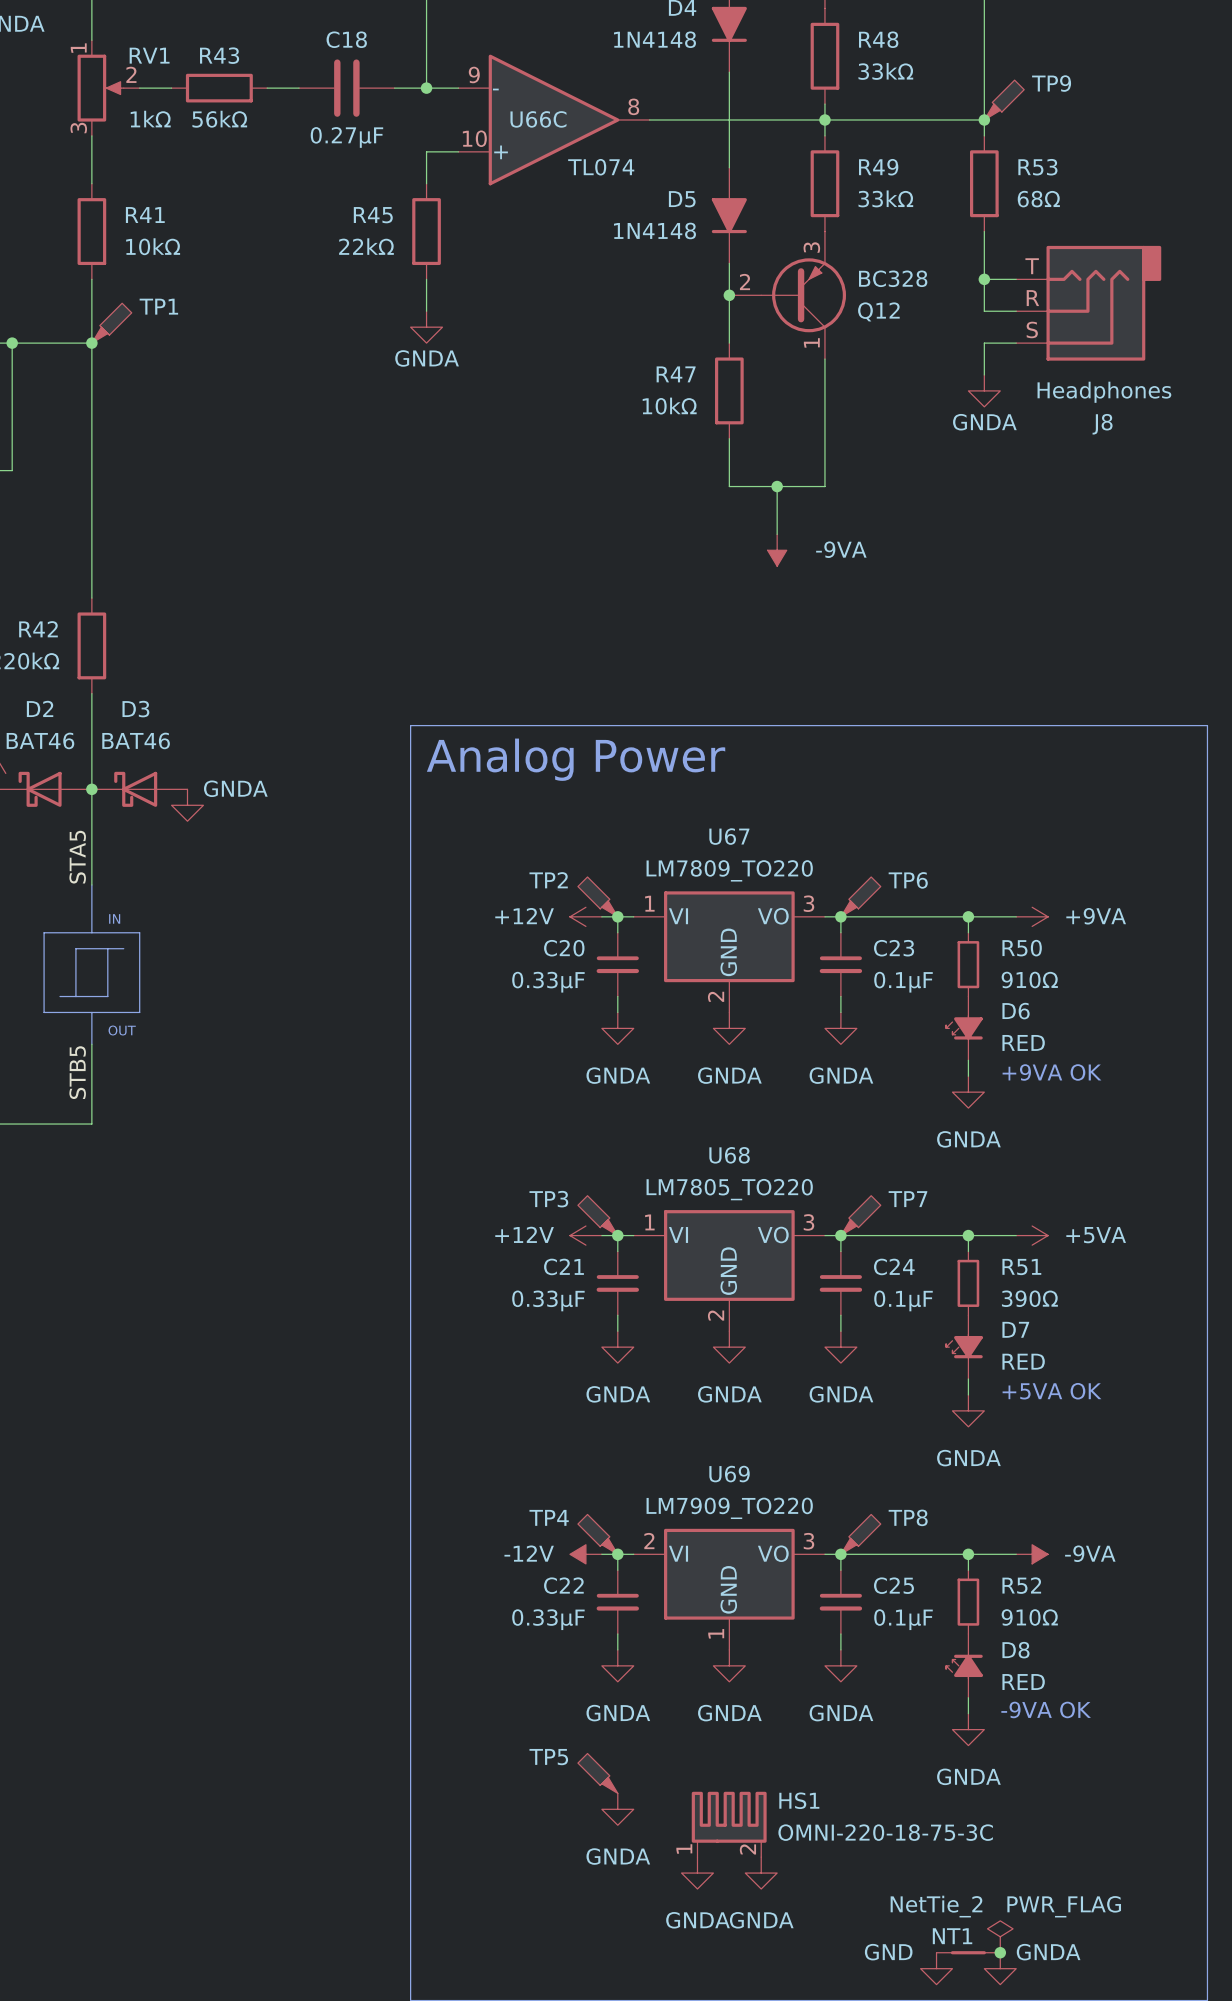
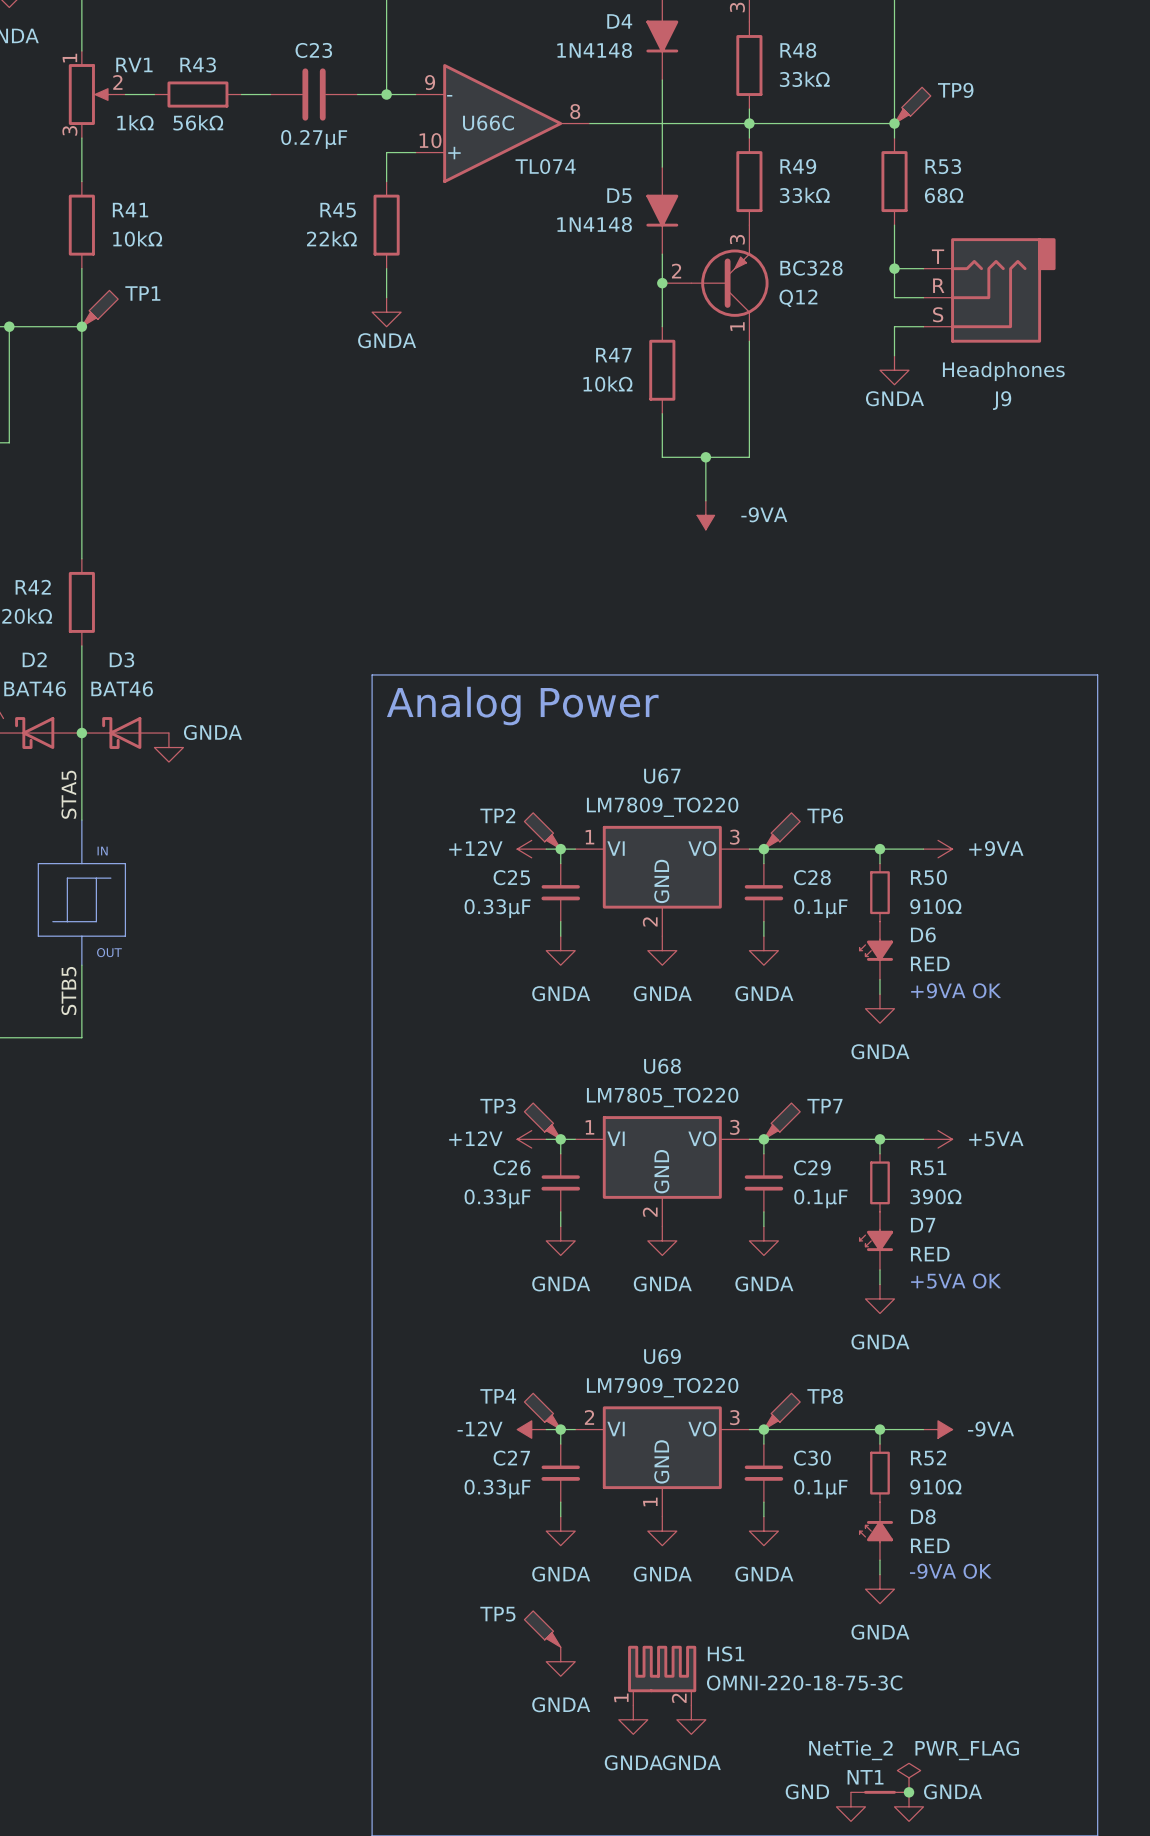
C18 name: C18 (346, 39) -> C23 (313, 50)
J8 name: J8 (1102, 424) -> J9 (1002, 400)
C20 name: C20 (564, 948) -> C25 (511, 877)
C23 name: C23 (894, 948) -> C28 (812, 877)
C21 name: C21 (563, 1266) -> C26 (512, 1167)
C24 name: C24 (894, 1266) -> C29 (812, 1167)
C22 name: C22 (563, 1585) -> C27 (511, 1458)
C25 name: C25 (893, 1585) -> C30 (812, 1458)

